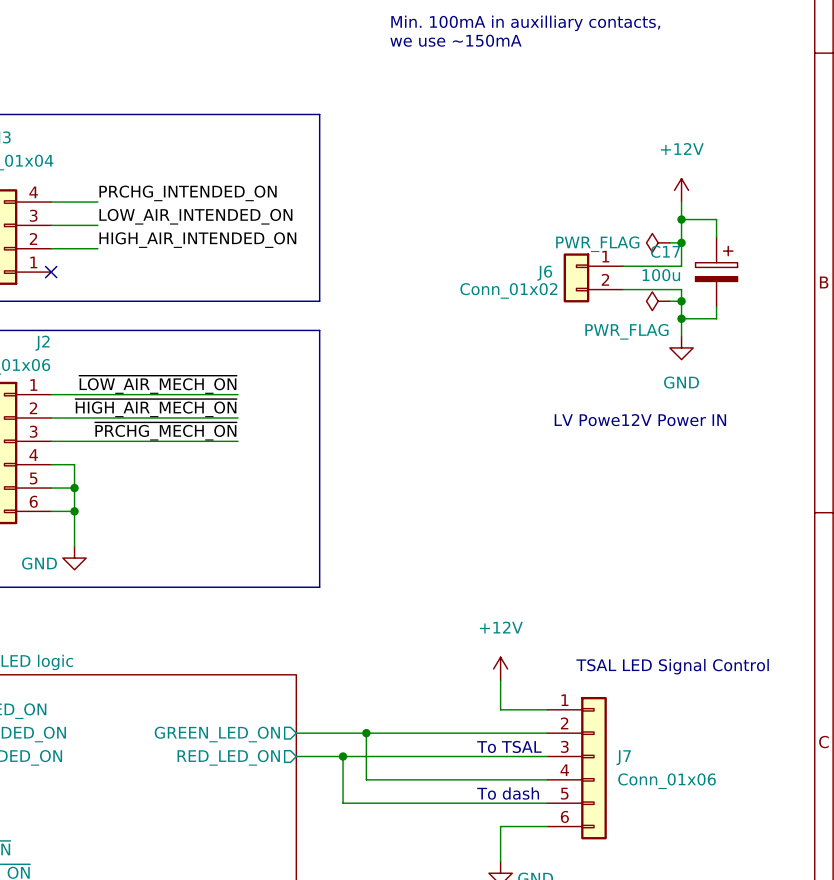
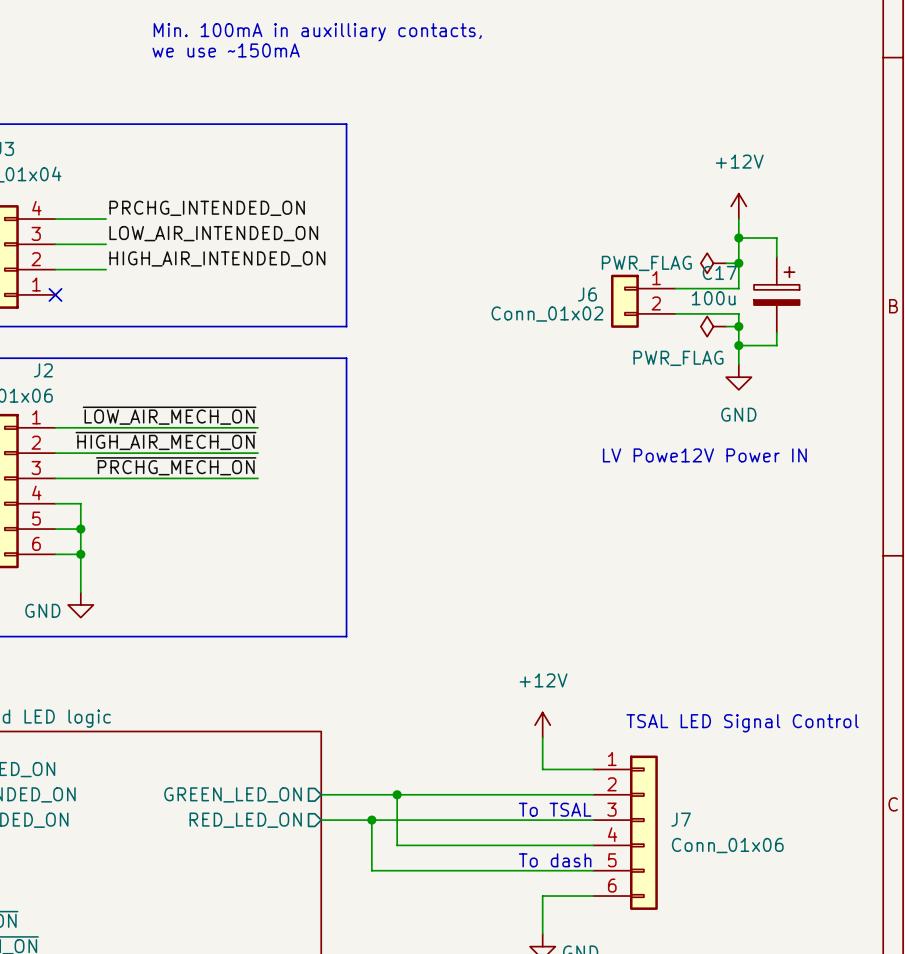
text: Min. 100mA in auxilliary contacts, (525, 23) -> none
text: none -> Min. 100mA in auxilliary contacts, (317, 32)
text: we use ~150mA (455, 40) -> none
text: none -> we use ~150mA (226, 50)

